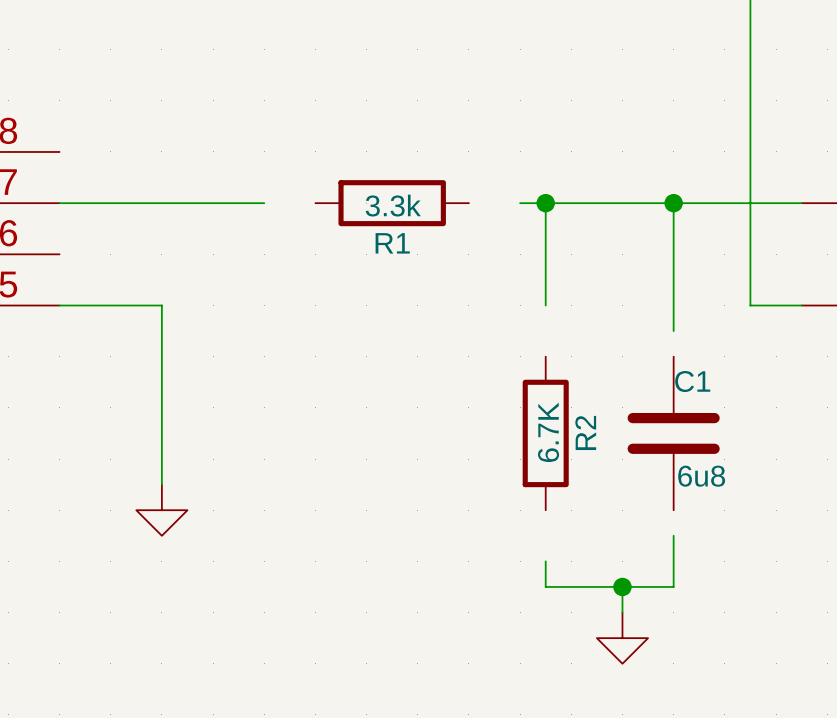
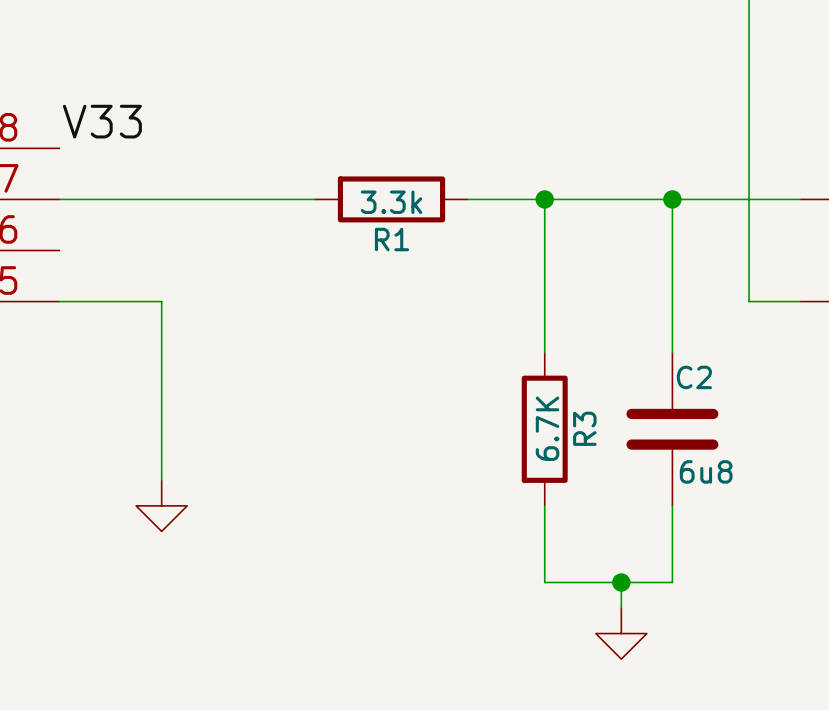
label: none -> V33 (102, 121)
wire: none -> (263, 199) (314, 199)
wire: none -> (468, 199) (519, 199)
wire: none -> (544, 301) (544, 352)
wire: none -> (672, 327) (672, 352)
C1 name: C1 (692, 381) -> C2 (694, 377)
R2 name: R2 (585, 432) -> R3 (584, 428)
wire: none -> (544, 505) (544, 556)
wire: none -> (672, 505) (672, 531)

